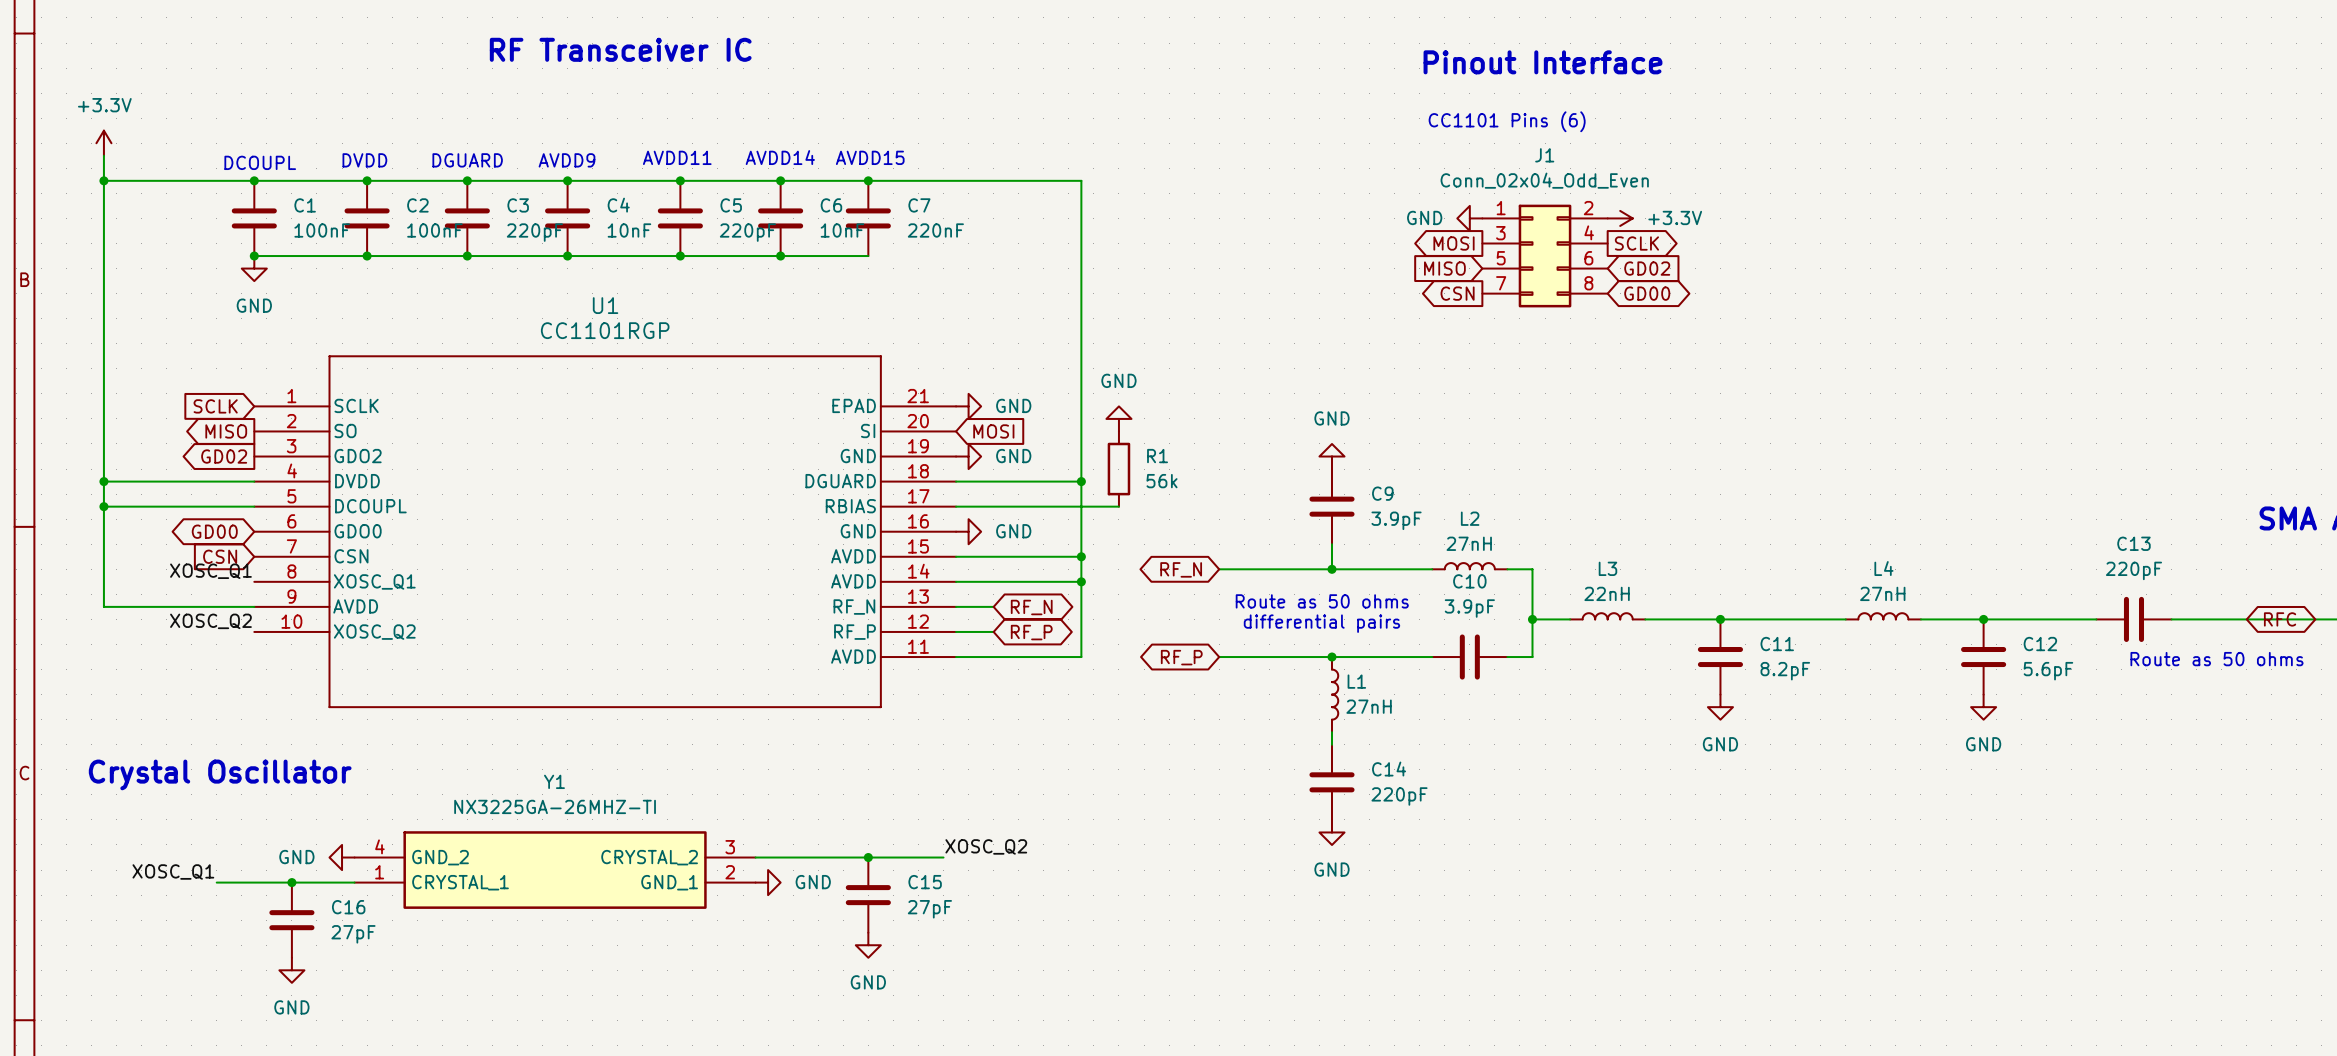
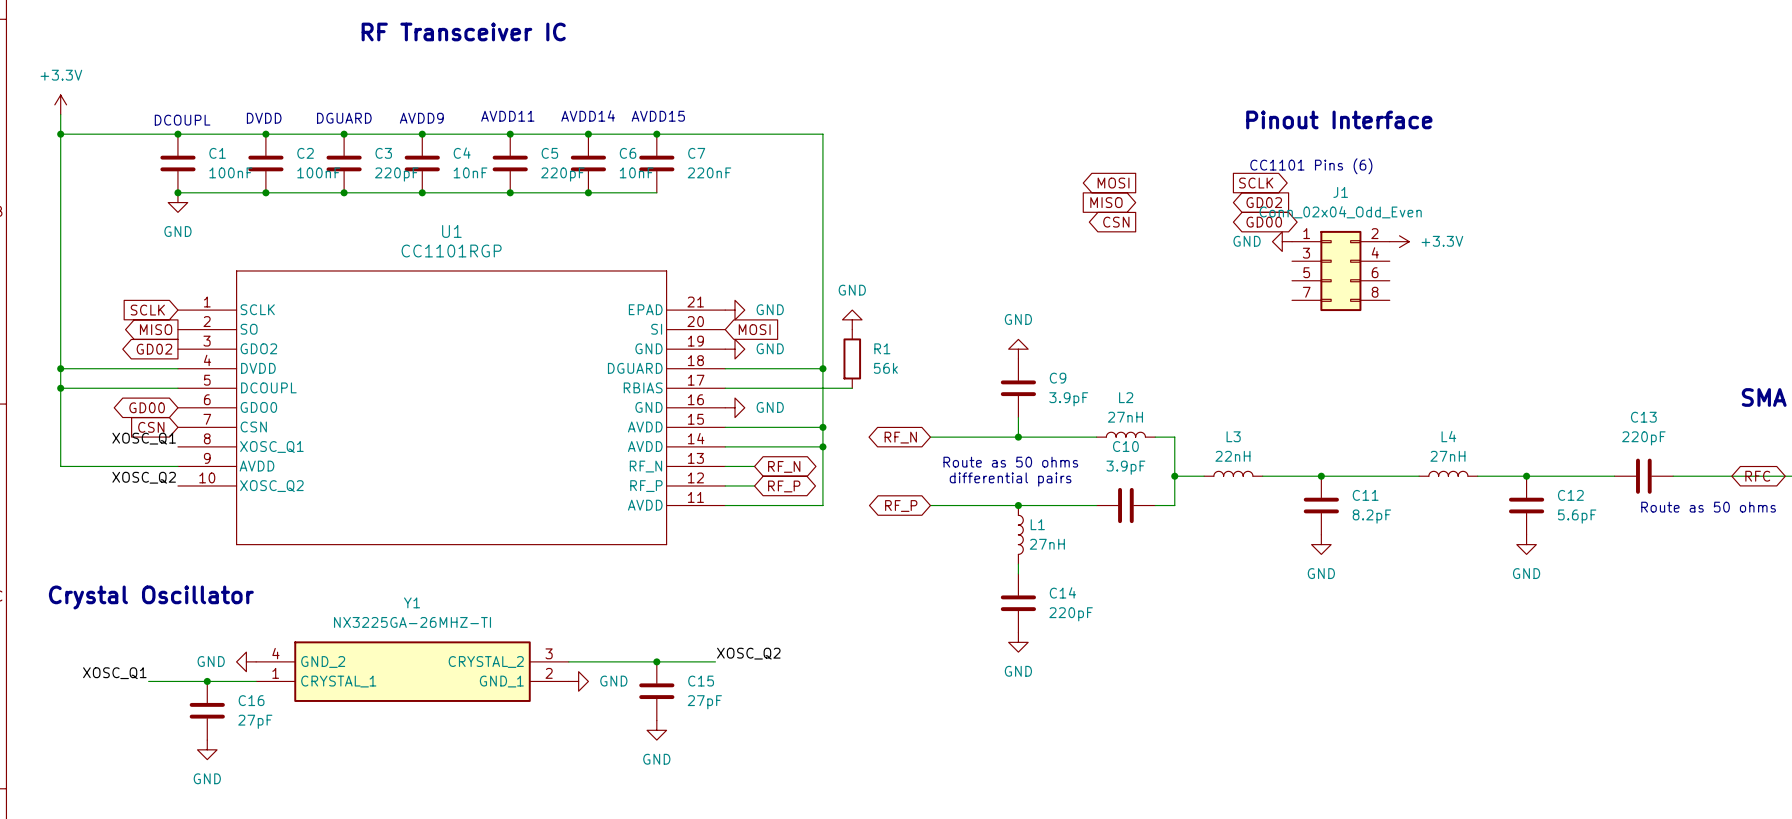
text position: Pinout Interface (1542, 62) -> Pinout Interface (1339, 119)
text position: CC1101 Pins (6) (1507, 121) -> CC1101 Pins (6) (1311, 166)
power symbol position: GND (1469, 218) -> GND (1282, 241)
power symbol position: +3.3V (1620, 218) -> +3.3V (1399, 241)
J1 position: (1545, 256) -> (1340, 270)

